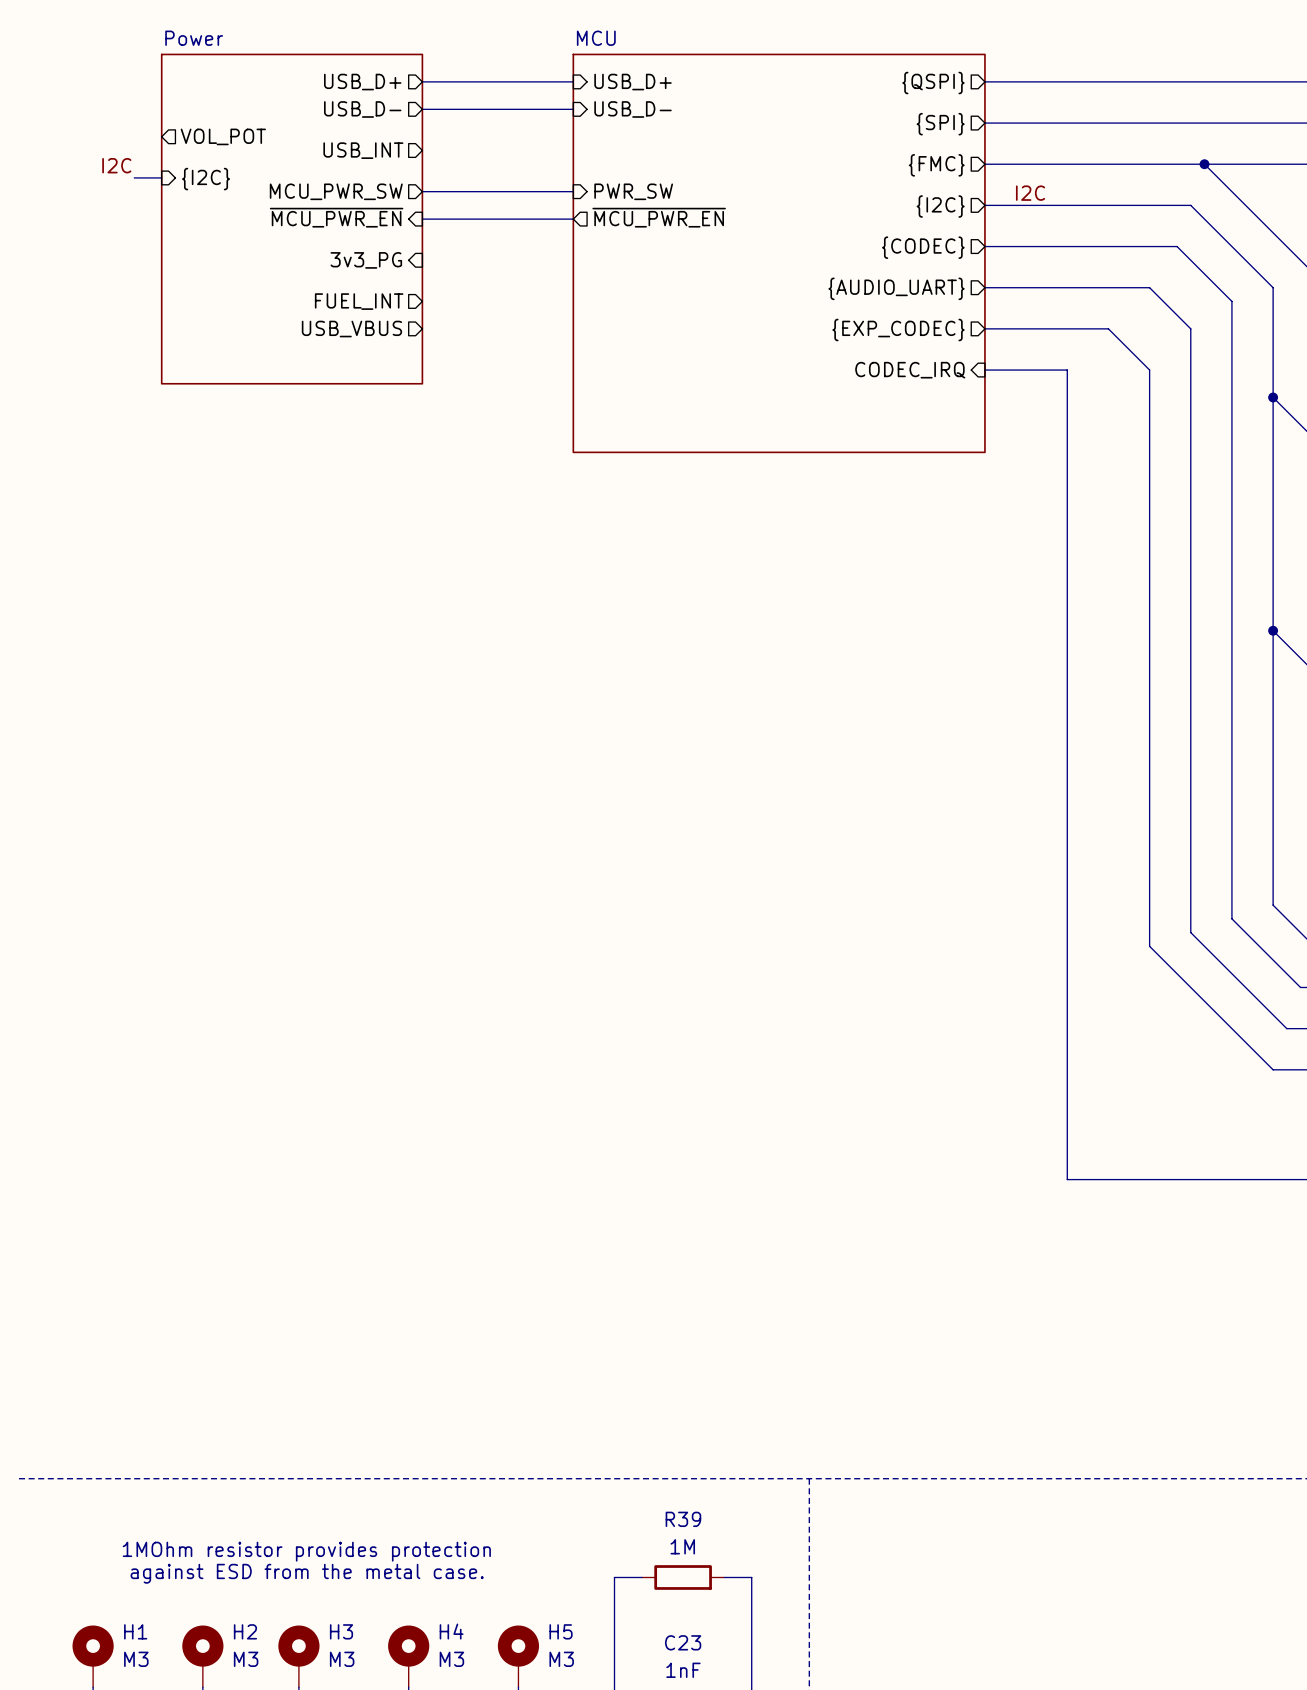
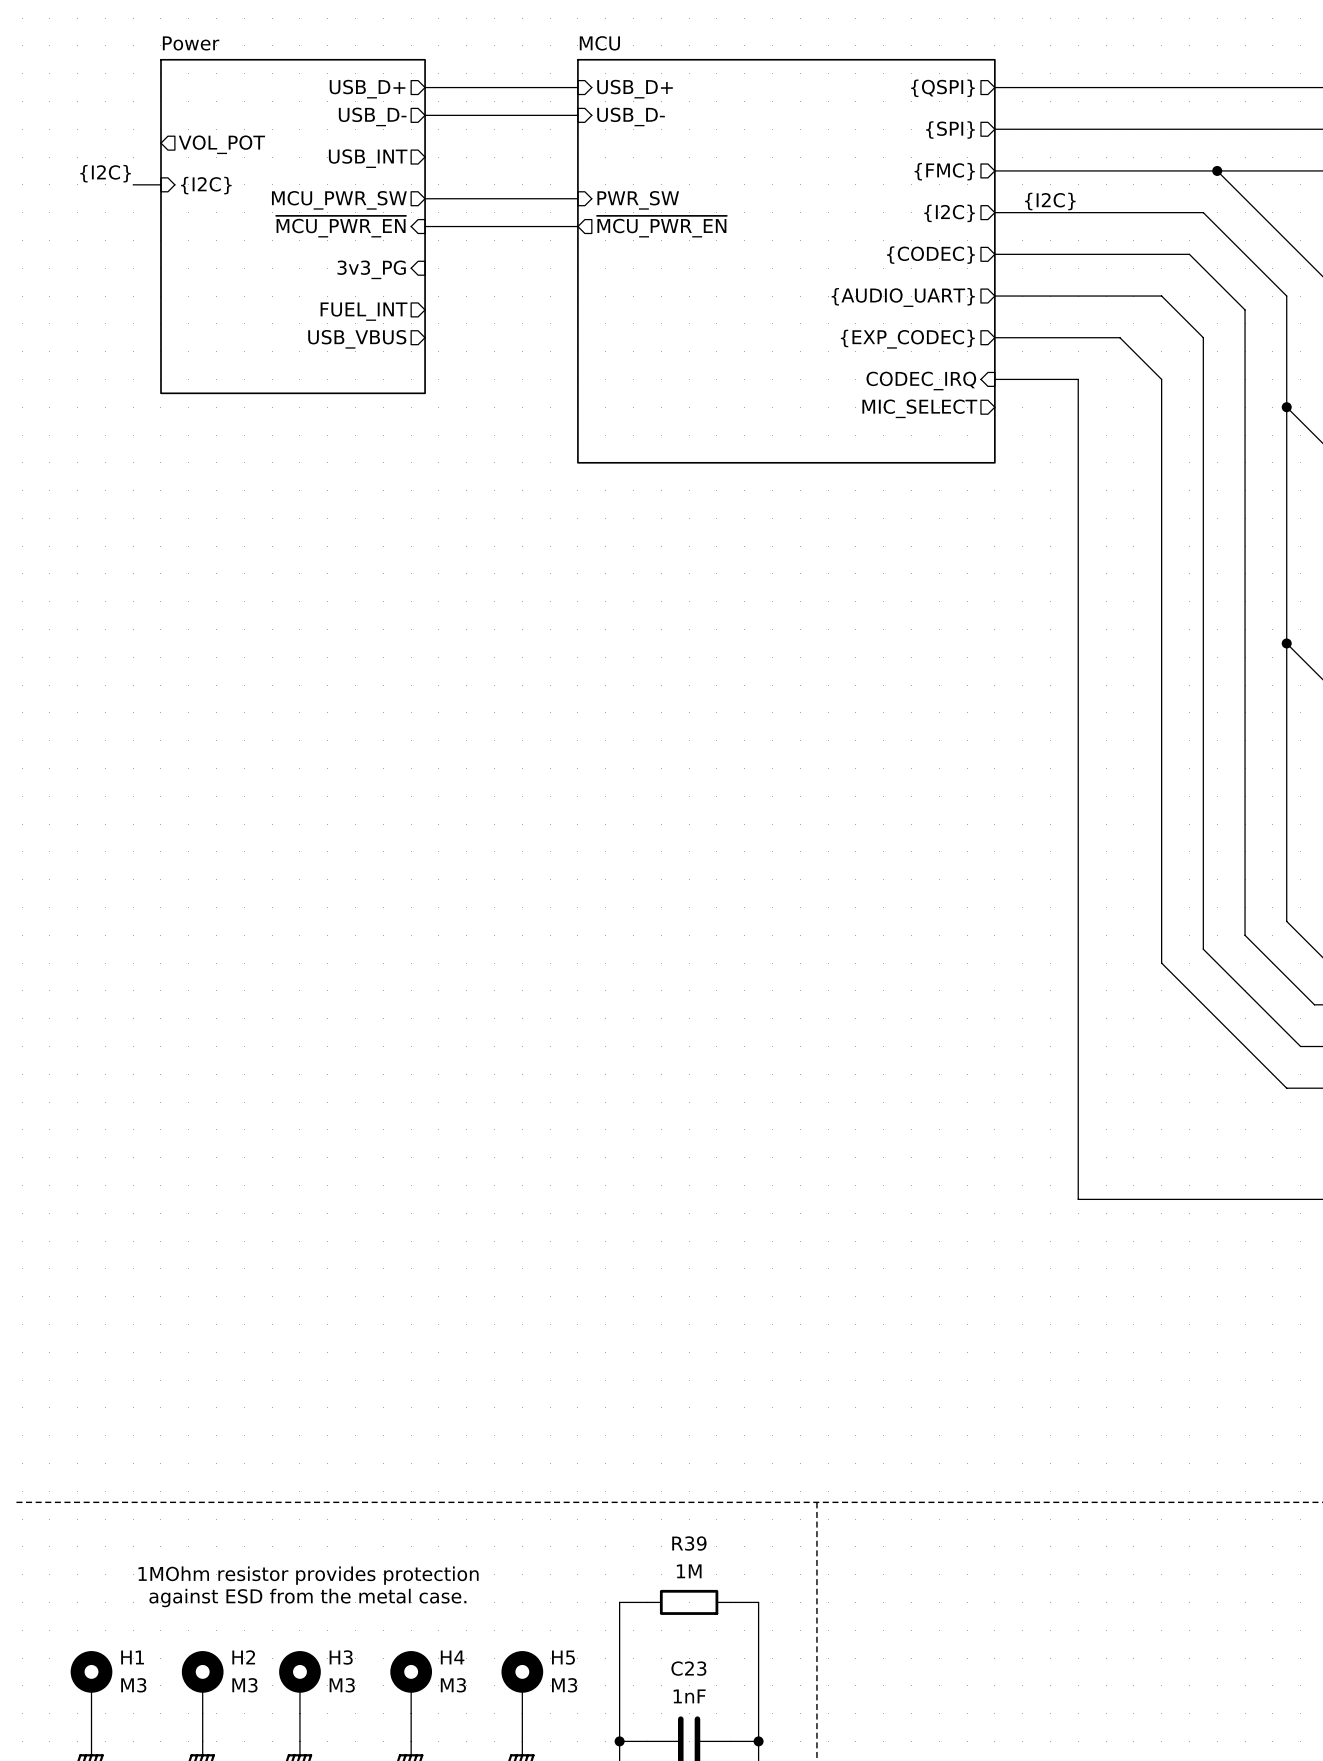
label: I2C (116, 165) -> {I2C} (105, 173)
label: I2C (1030, 193) -> {I2C} (1050, 201)
sheet pin: none -> MIC_SELECT (919, 408)

